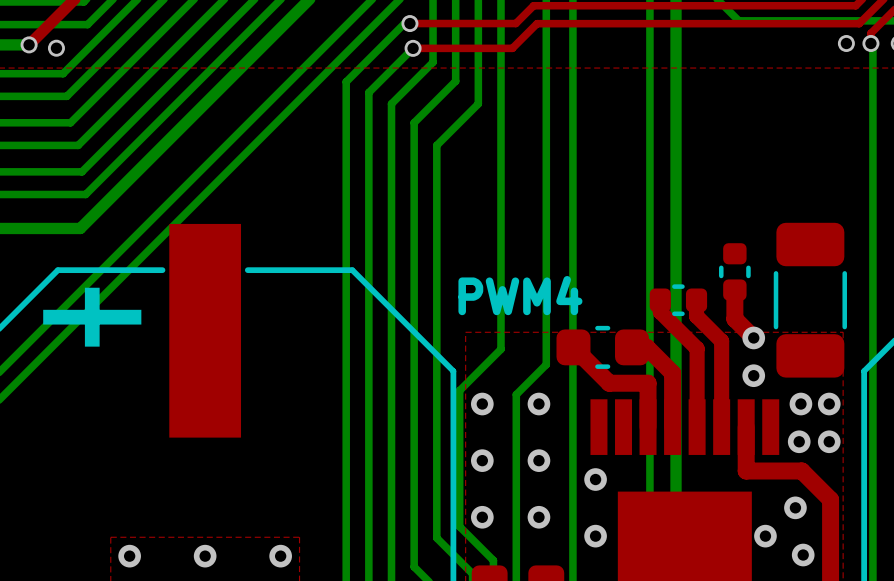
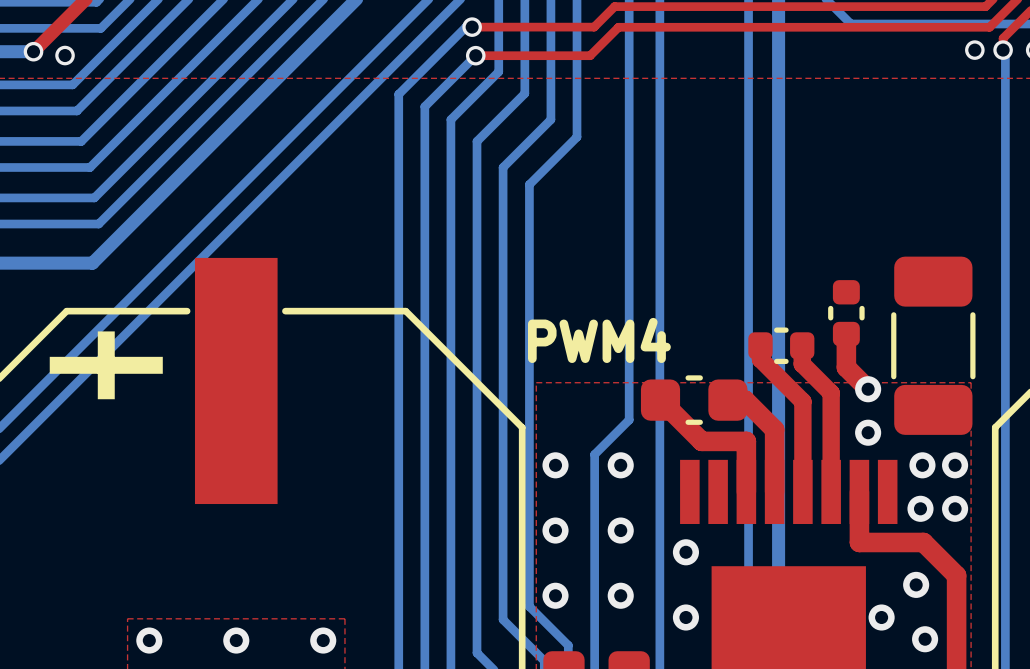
bottom track: (500, 119) (500, 349) (459, 390) -> (577, 137) (529, 184) (529, 449)

